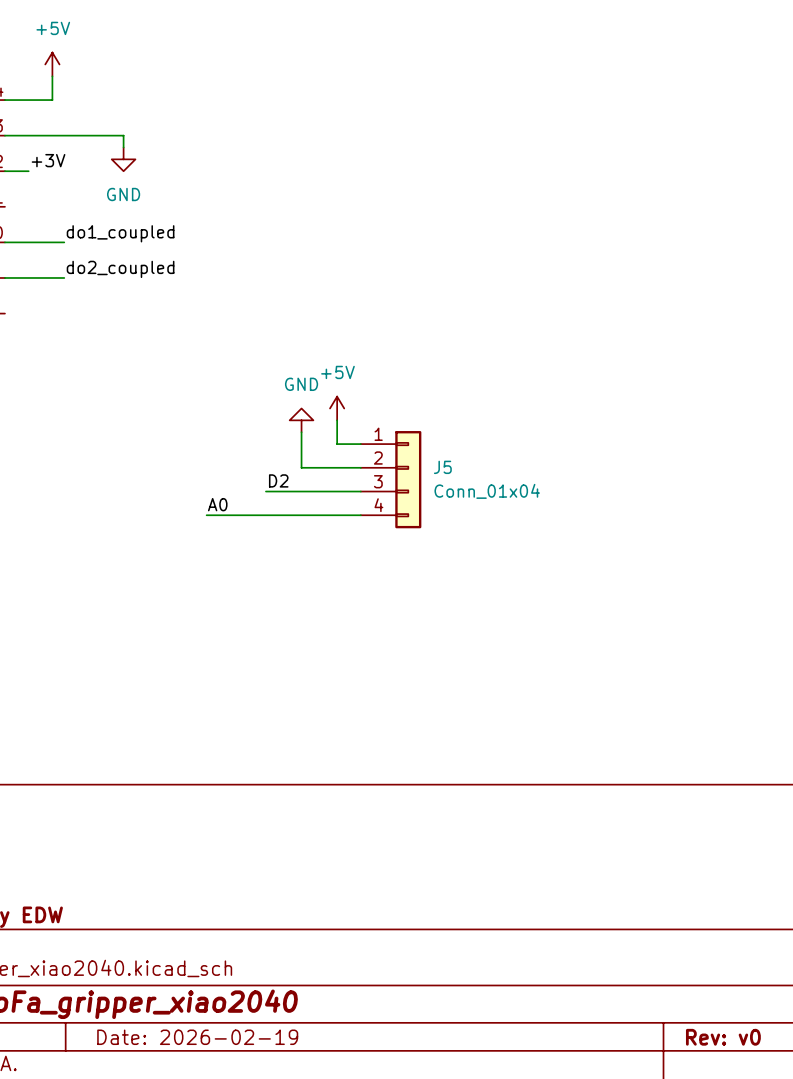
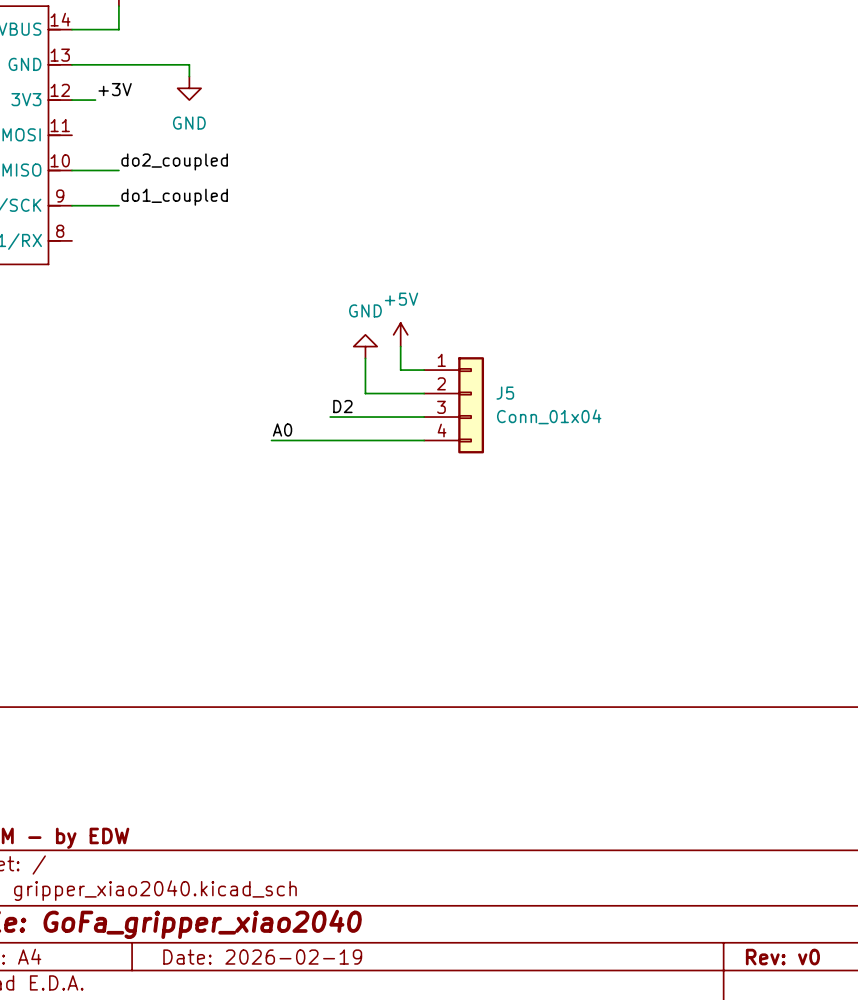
label position: do1_coupled (120, 233) -> do1_coupled (174, 197)
wire: (52, 242) (64, 242) -> none
label position: do2_coupled (120, 269) -> do2_coupled (174, 161)
wire: (52, 277) (64, 277) -> none

